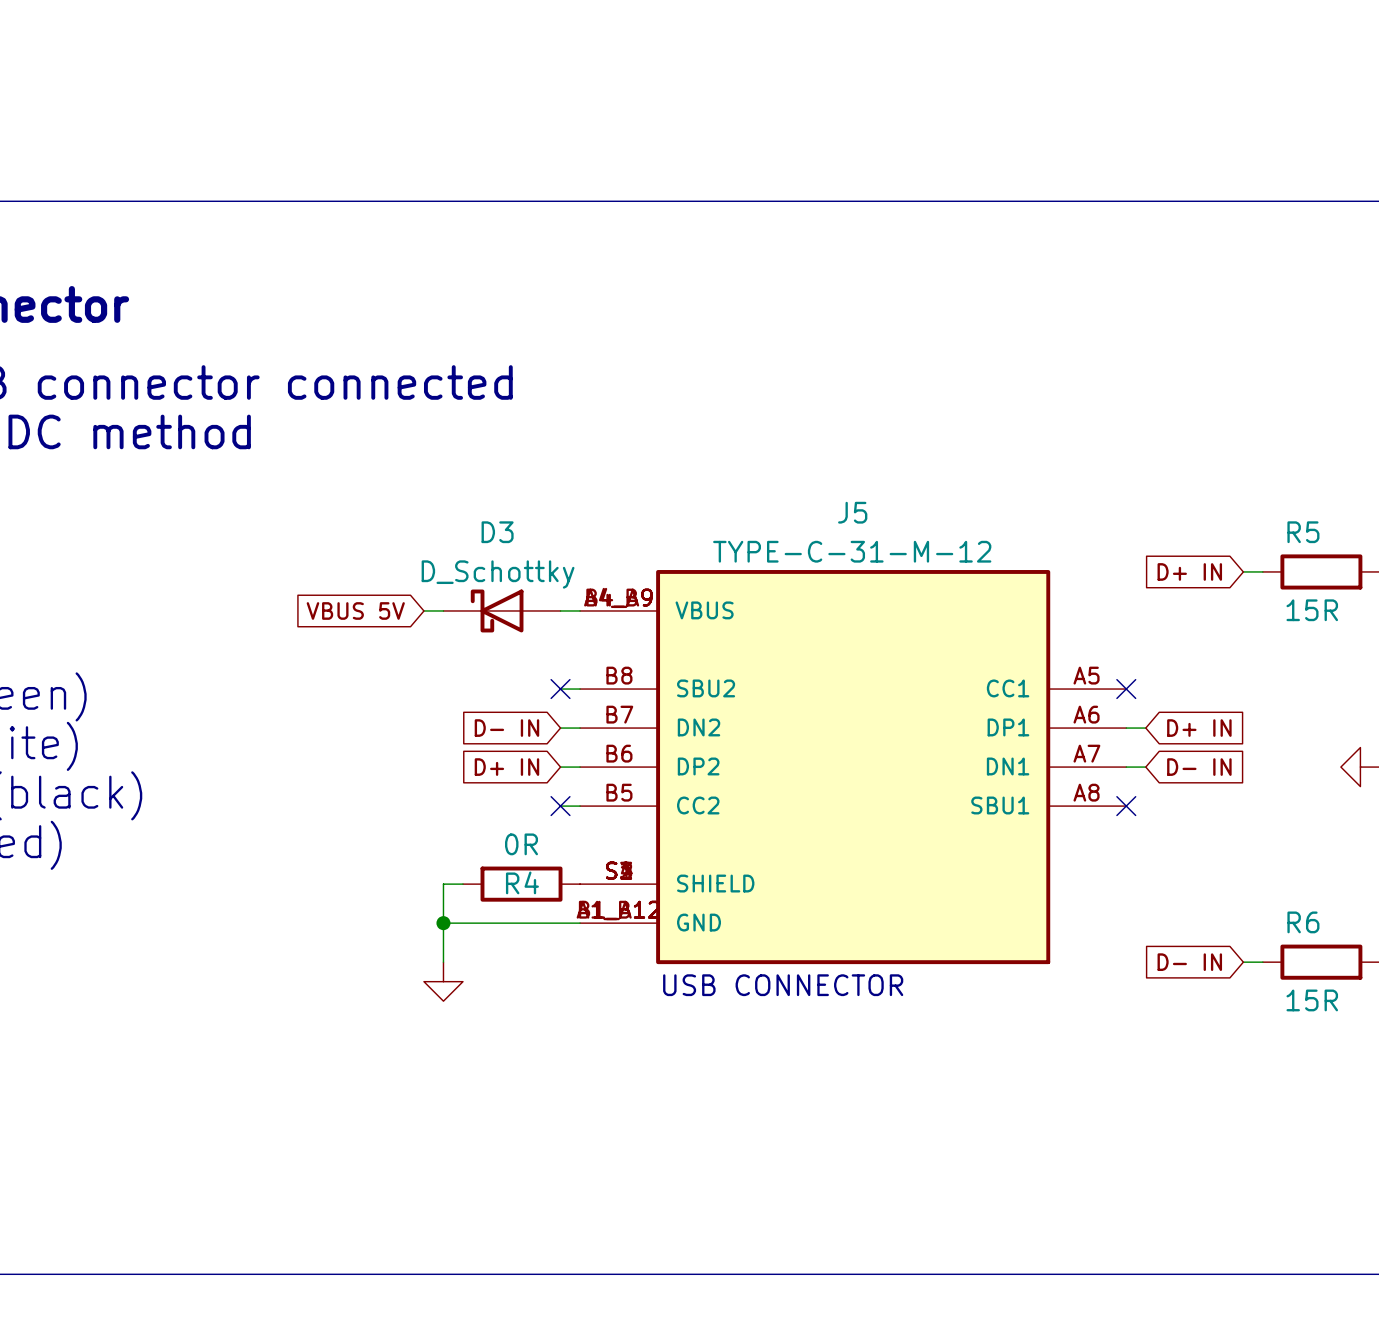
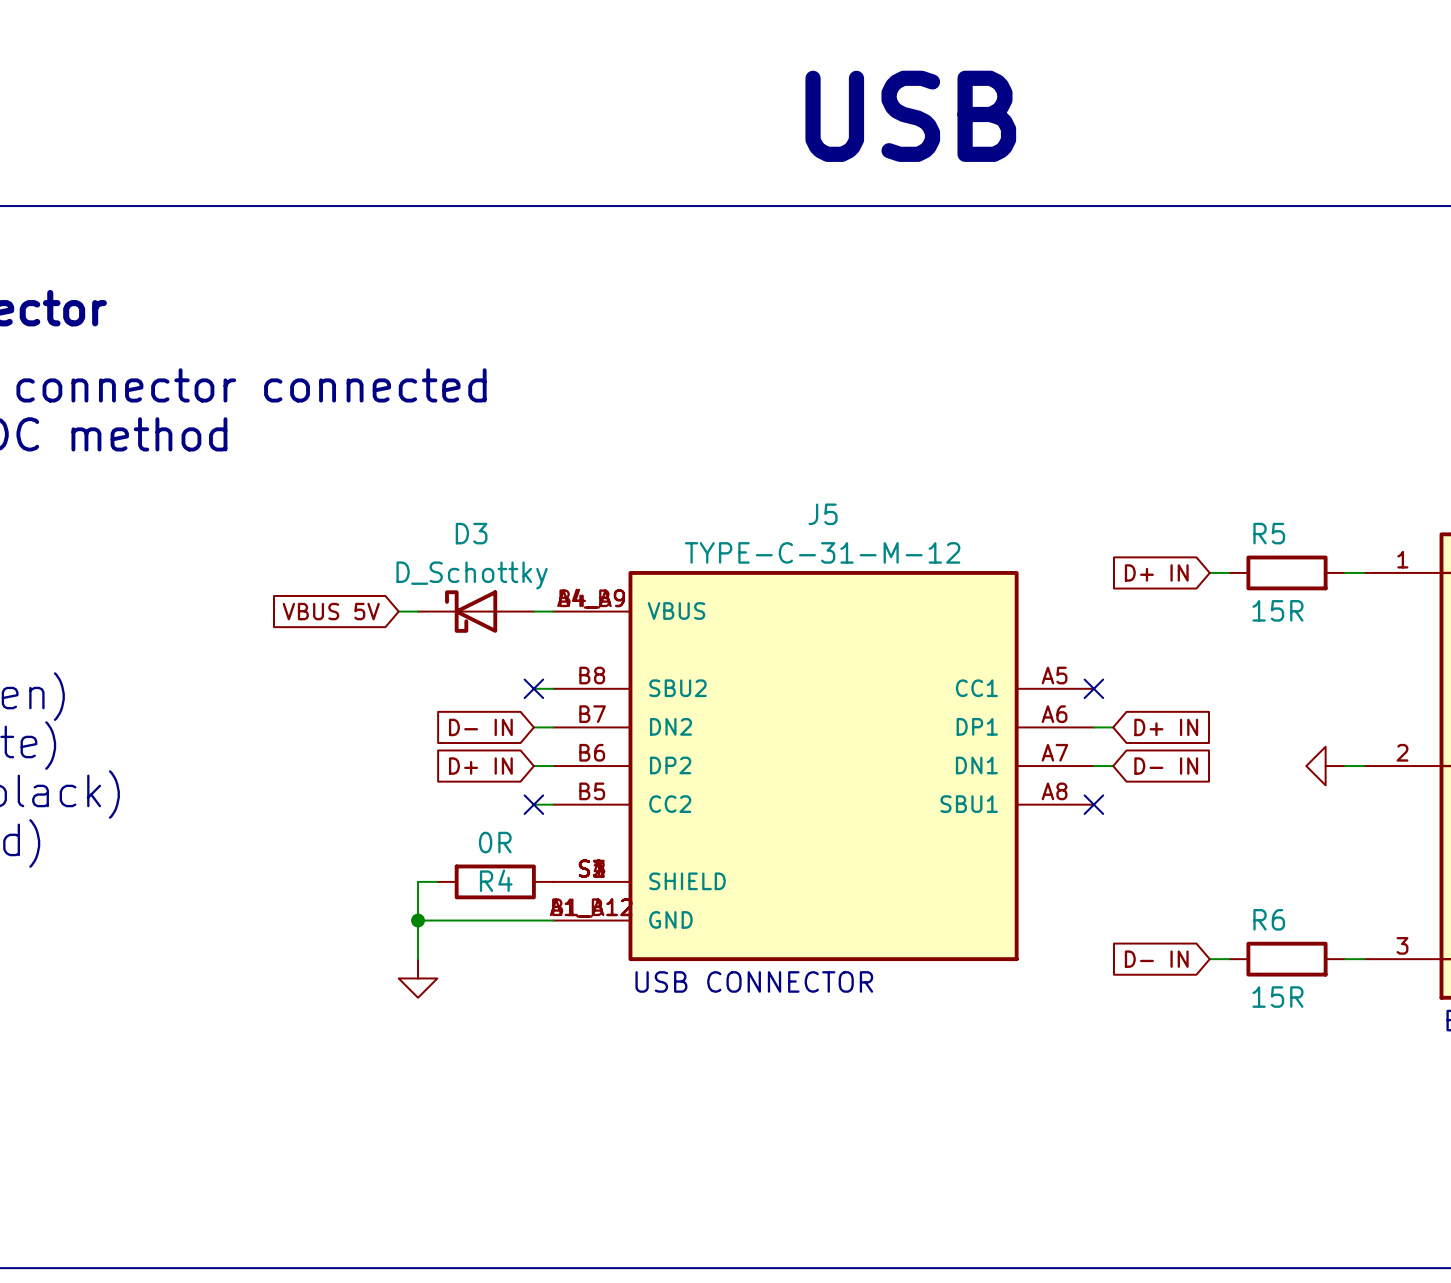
text: none -> USB (910, 116)

